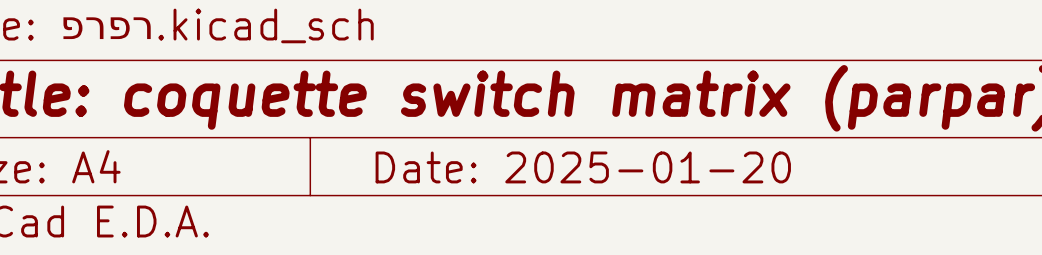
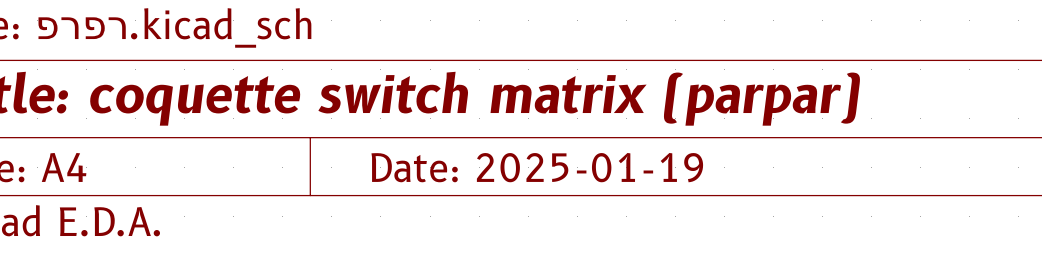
title block: Date: 2025-01-20 (583, 167) -> Date: 2025-01-19 (537, 167)

